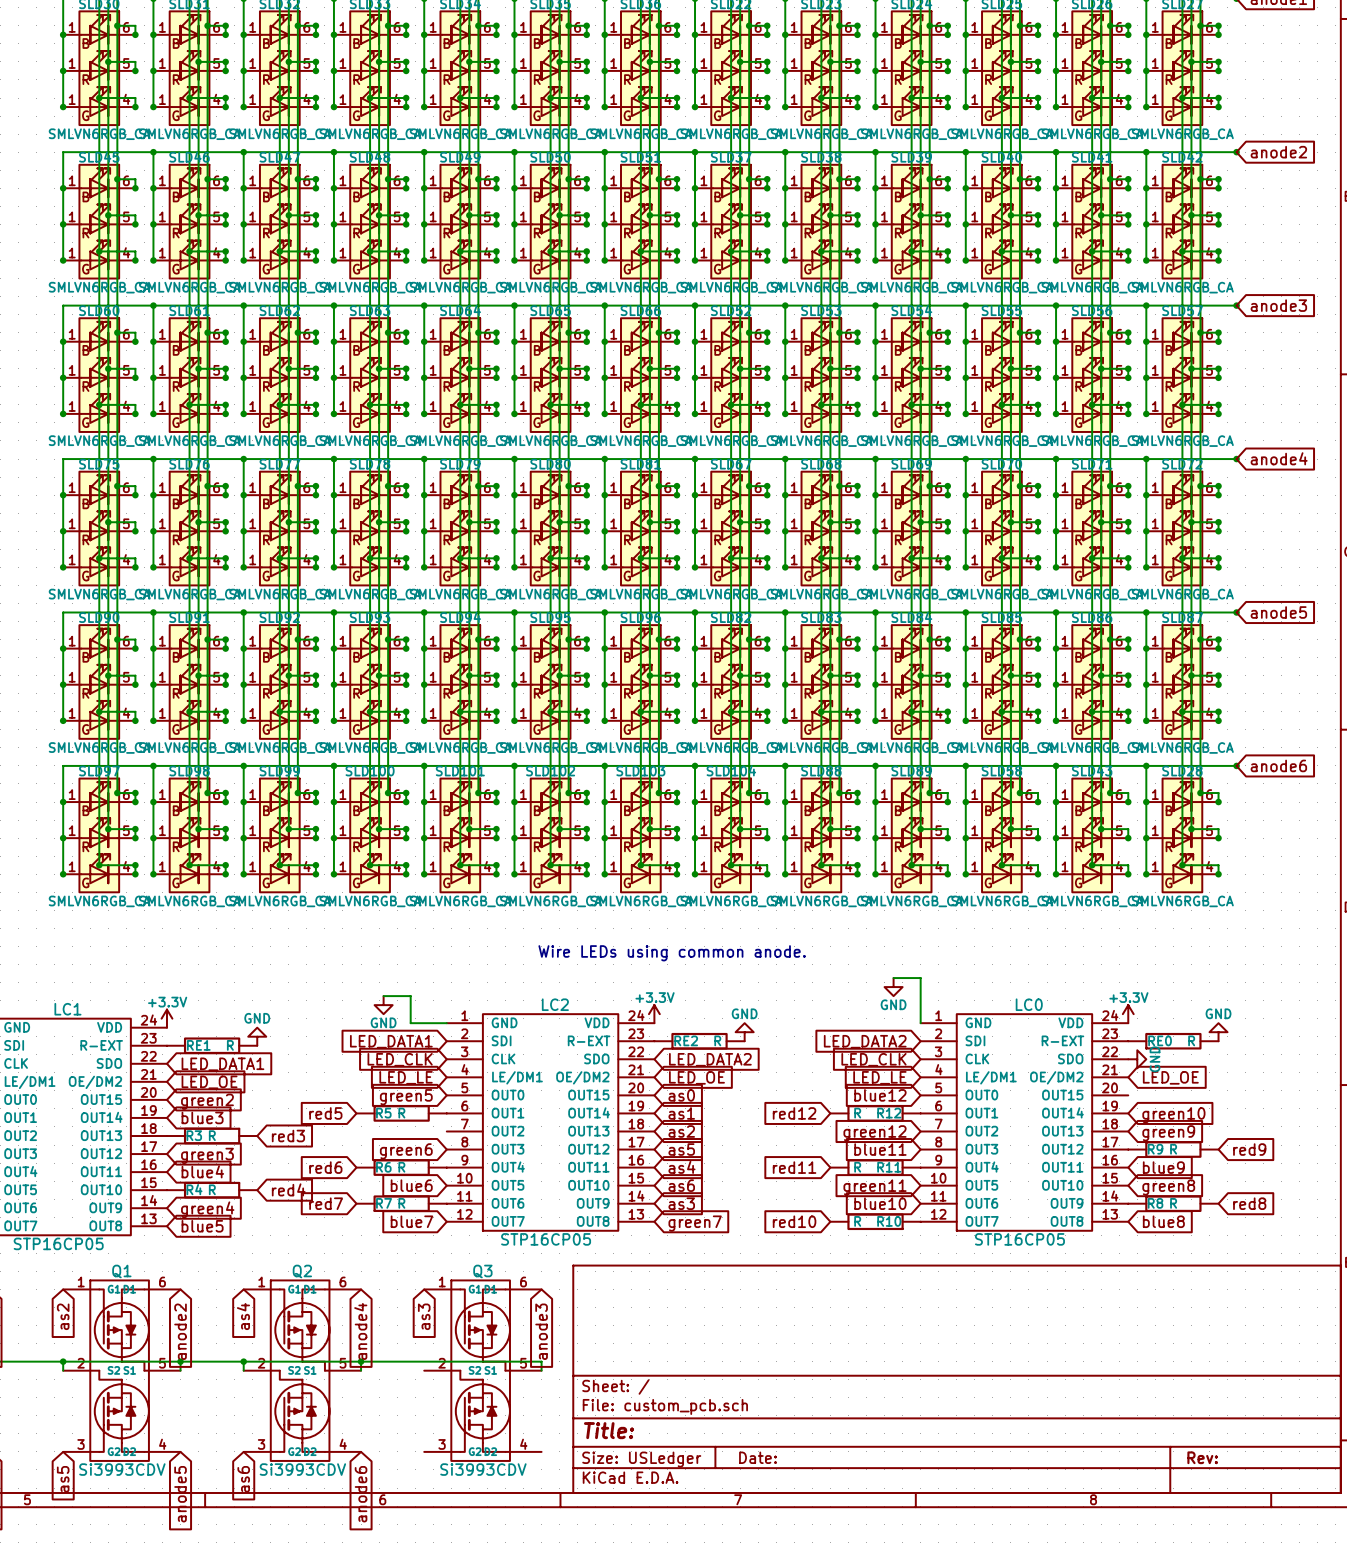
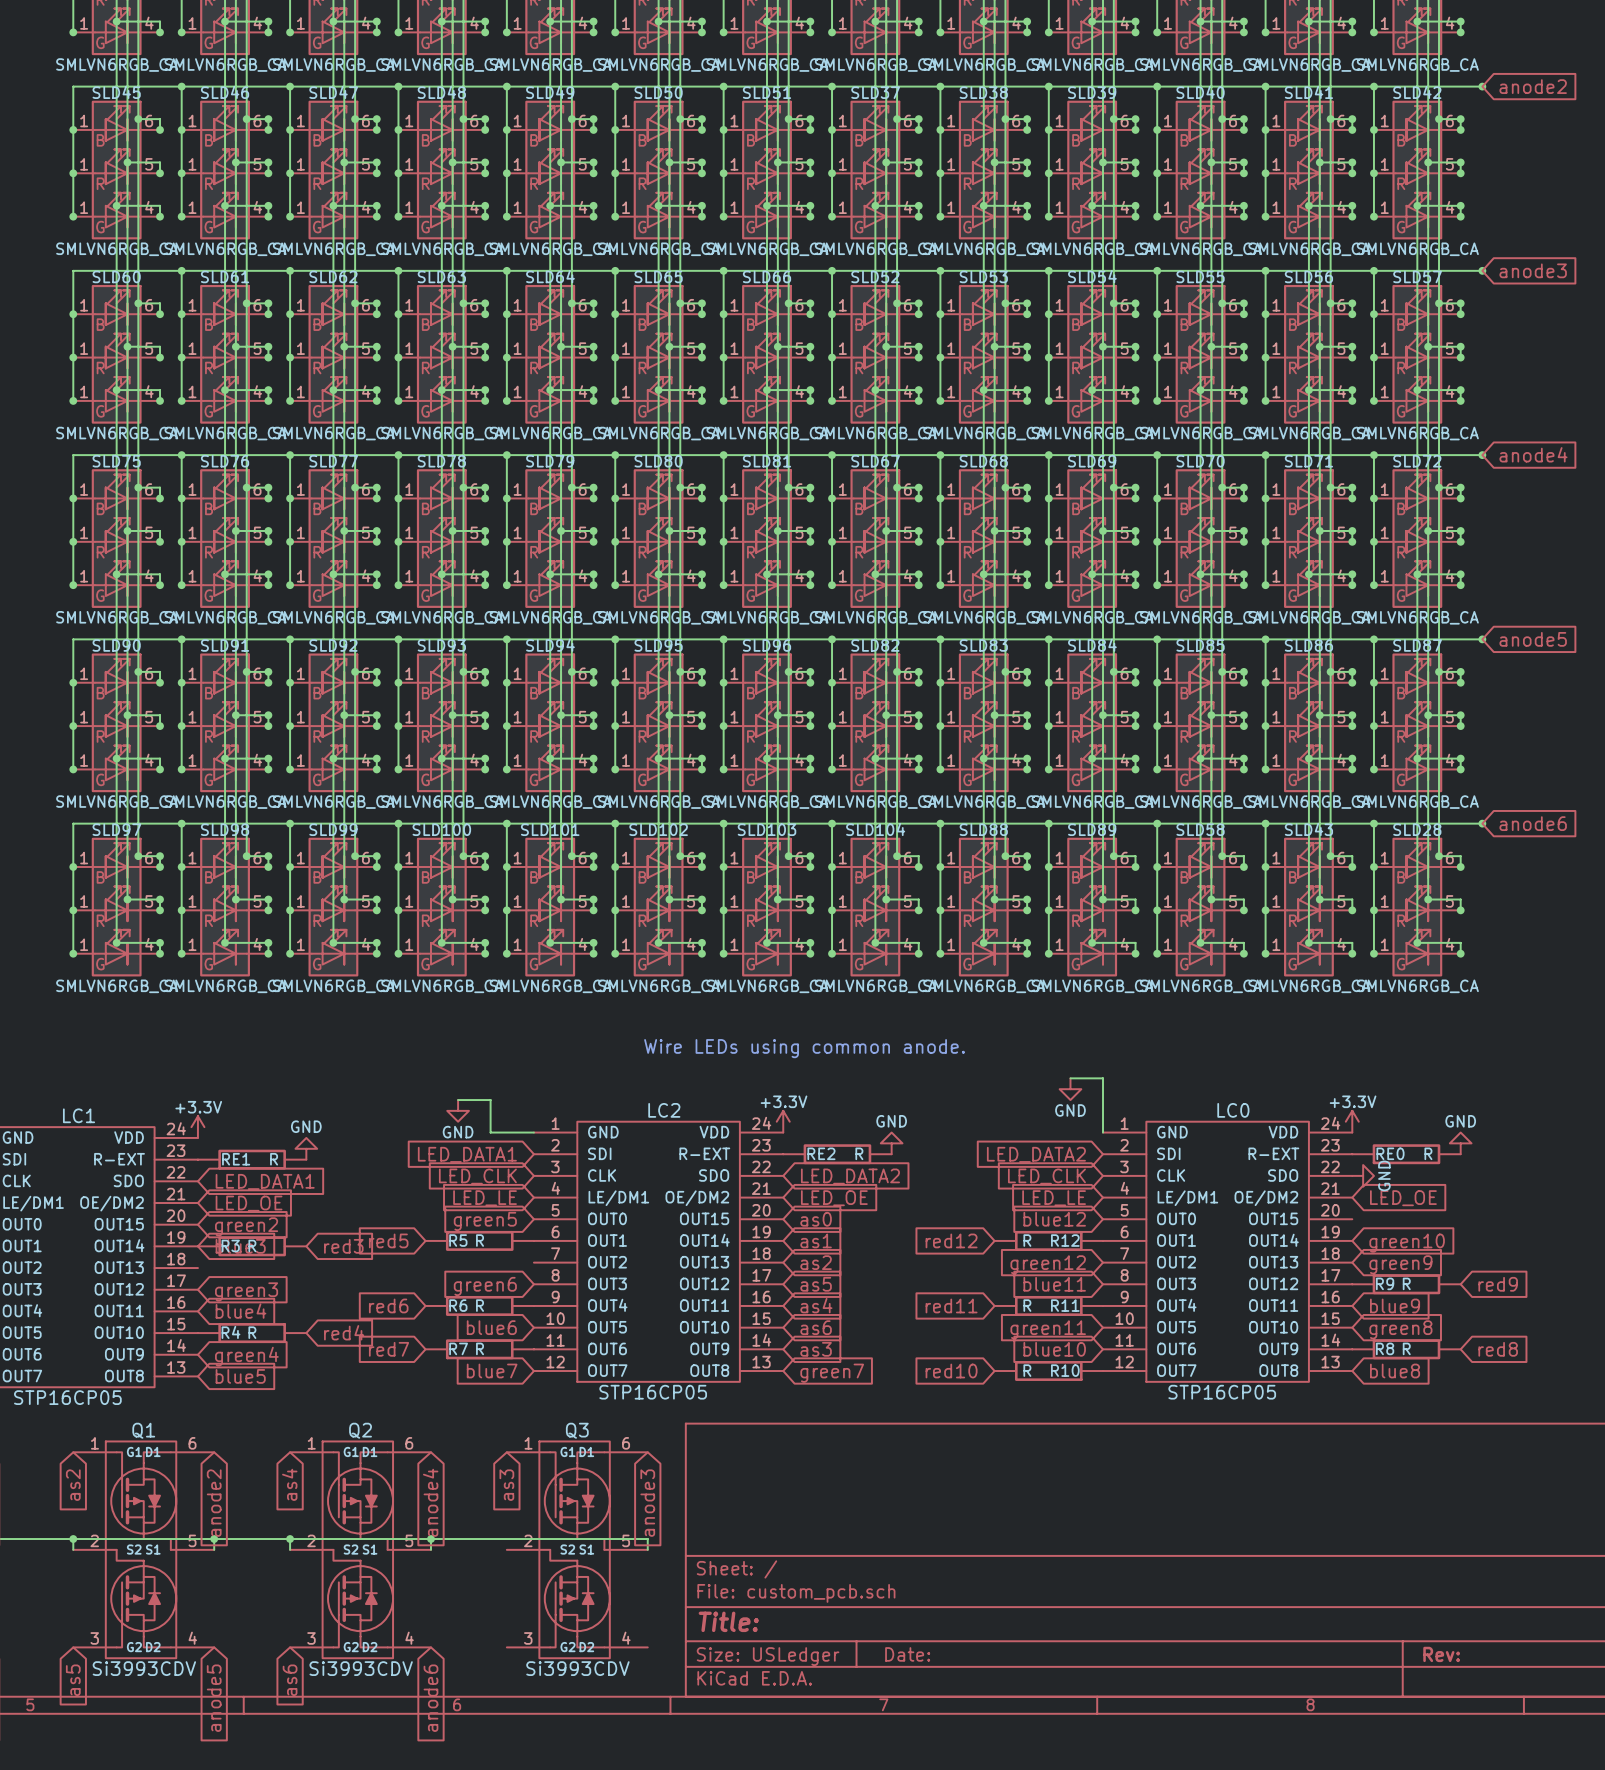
R3 position: (212, 1136) -> (252, 1246)
global label position: red3 (288, 1136) -> red3 (343, 1246)

